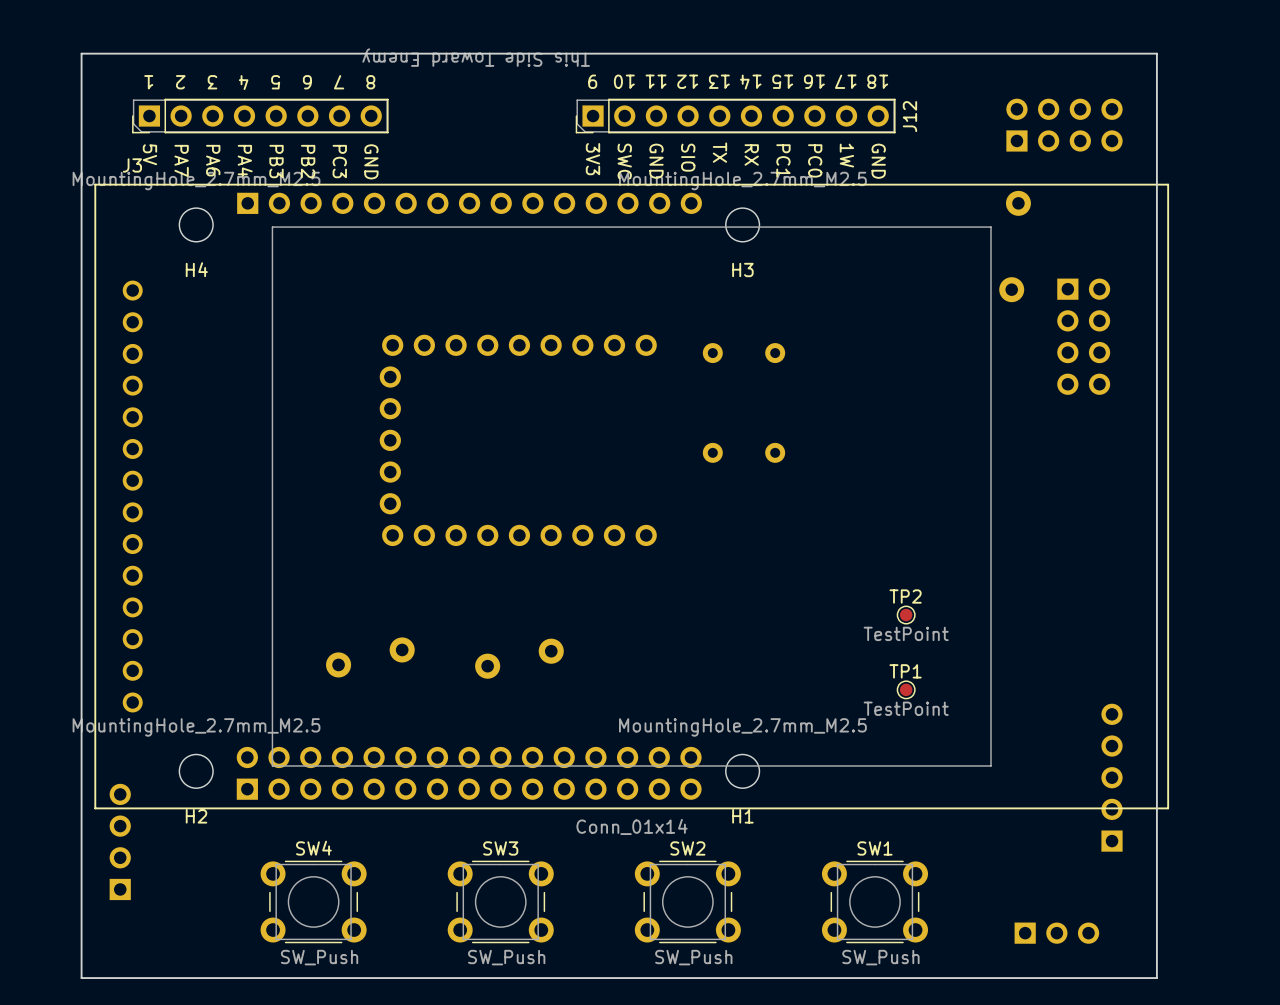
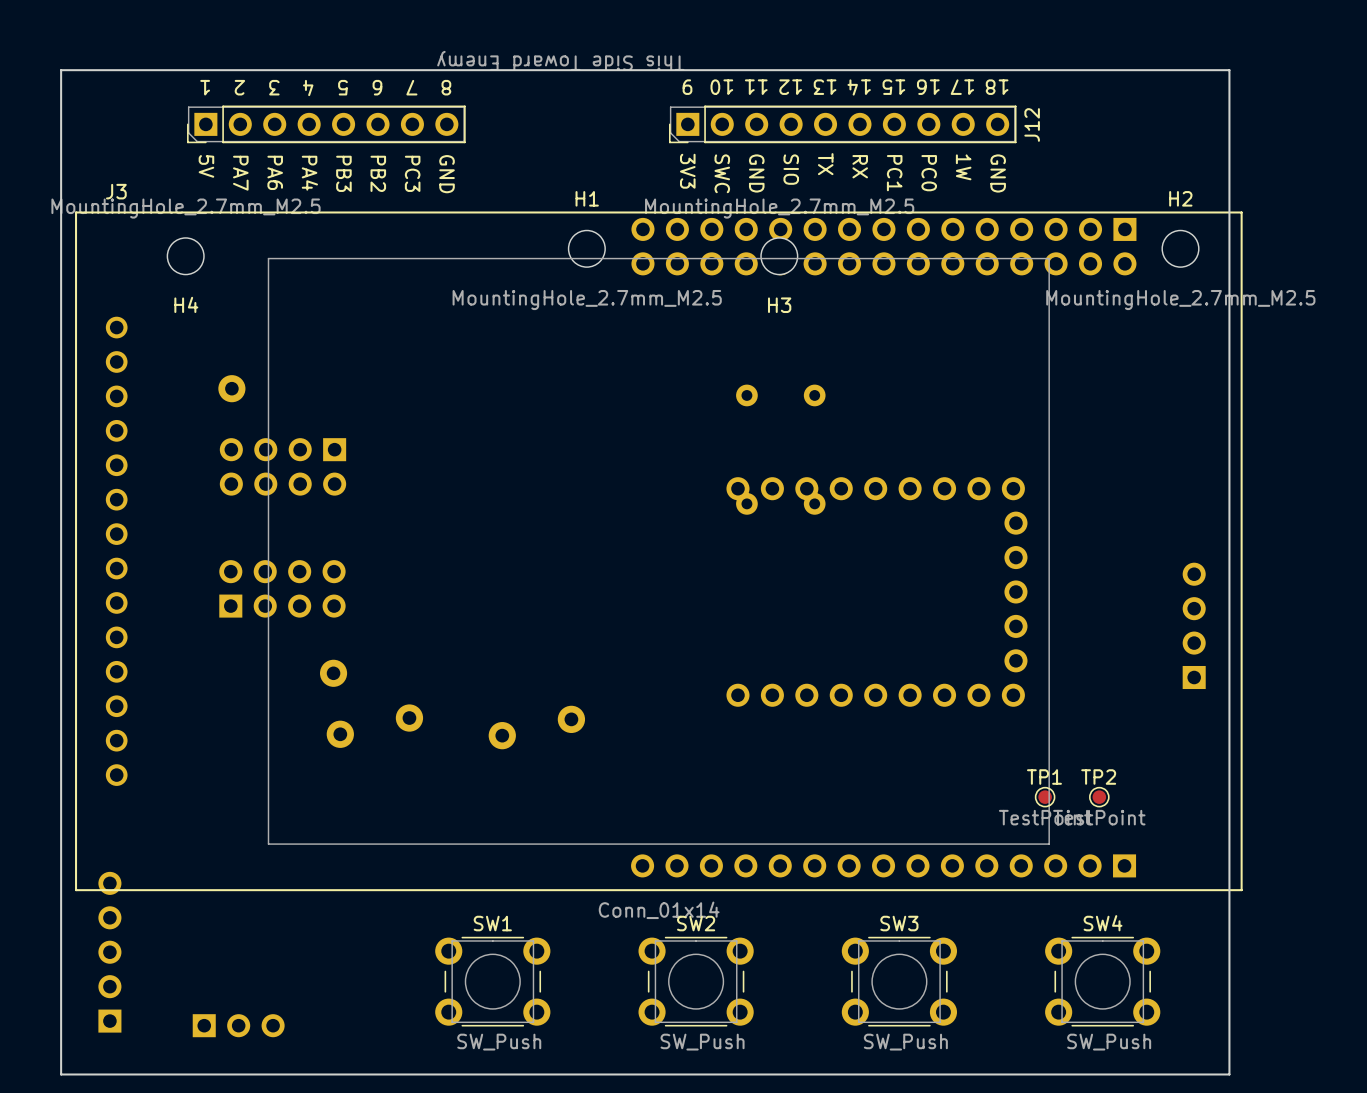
J12 position: (513, 116) -> (601, 124)
part: (1064, 125) -> none
part: (469, 203) -> none
part: (1018, 203) -> none
part: none -> (883, 246)
part: (1011, 289) -> none
part: (1083, 336) -> none
part: none -> (231, 388)
part: none -> (282, 466)
part: (518, 440) -> none
part: none -> (282, 588)
part: none -> (876, 591)
part: none -> (1194, 625)
part: none -> (333, 673)
TP2 position: (906, 615) -> (1099, 797)
TP1 position: (906, 689) -> (1045, 797)
H2 value position: MountingHole_2.7mm_M2.5 (196, 727) -> MountingHole_2.7mm_M2.5 (1180, 300)
H1 value position: MountingHole_2.7mm_M2.5 (742, 727) -> MountingHole_2.7mm_M2.5 (587, 300)
H2 position: (196, 771) -> (1180, 248)
H1 position: (742, 771) -> (586, 248)
part: (469, 773) -> none
part: (1112, 777) -> none
part: none -> (883, 865)
H2 name position: H2 (196, 816) -> H2 (1180, 198)
H1 name position: H1 (742, 816) -> H1 (587, 198)
part: (120, 841) -> none
part: none -> (109, 952)
SW4 position: (313, 901) -> (1102, 981)
SW3 position: (500, 901) -> (899, 981)
SW2 position: (687, 901) -> (696, 981)
SW1 position: (874, 901) -> (492, 981)
part: none -> (238, 1025)
part: (1056, 933) -> none

